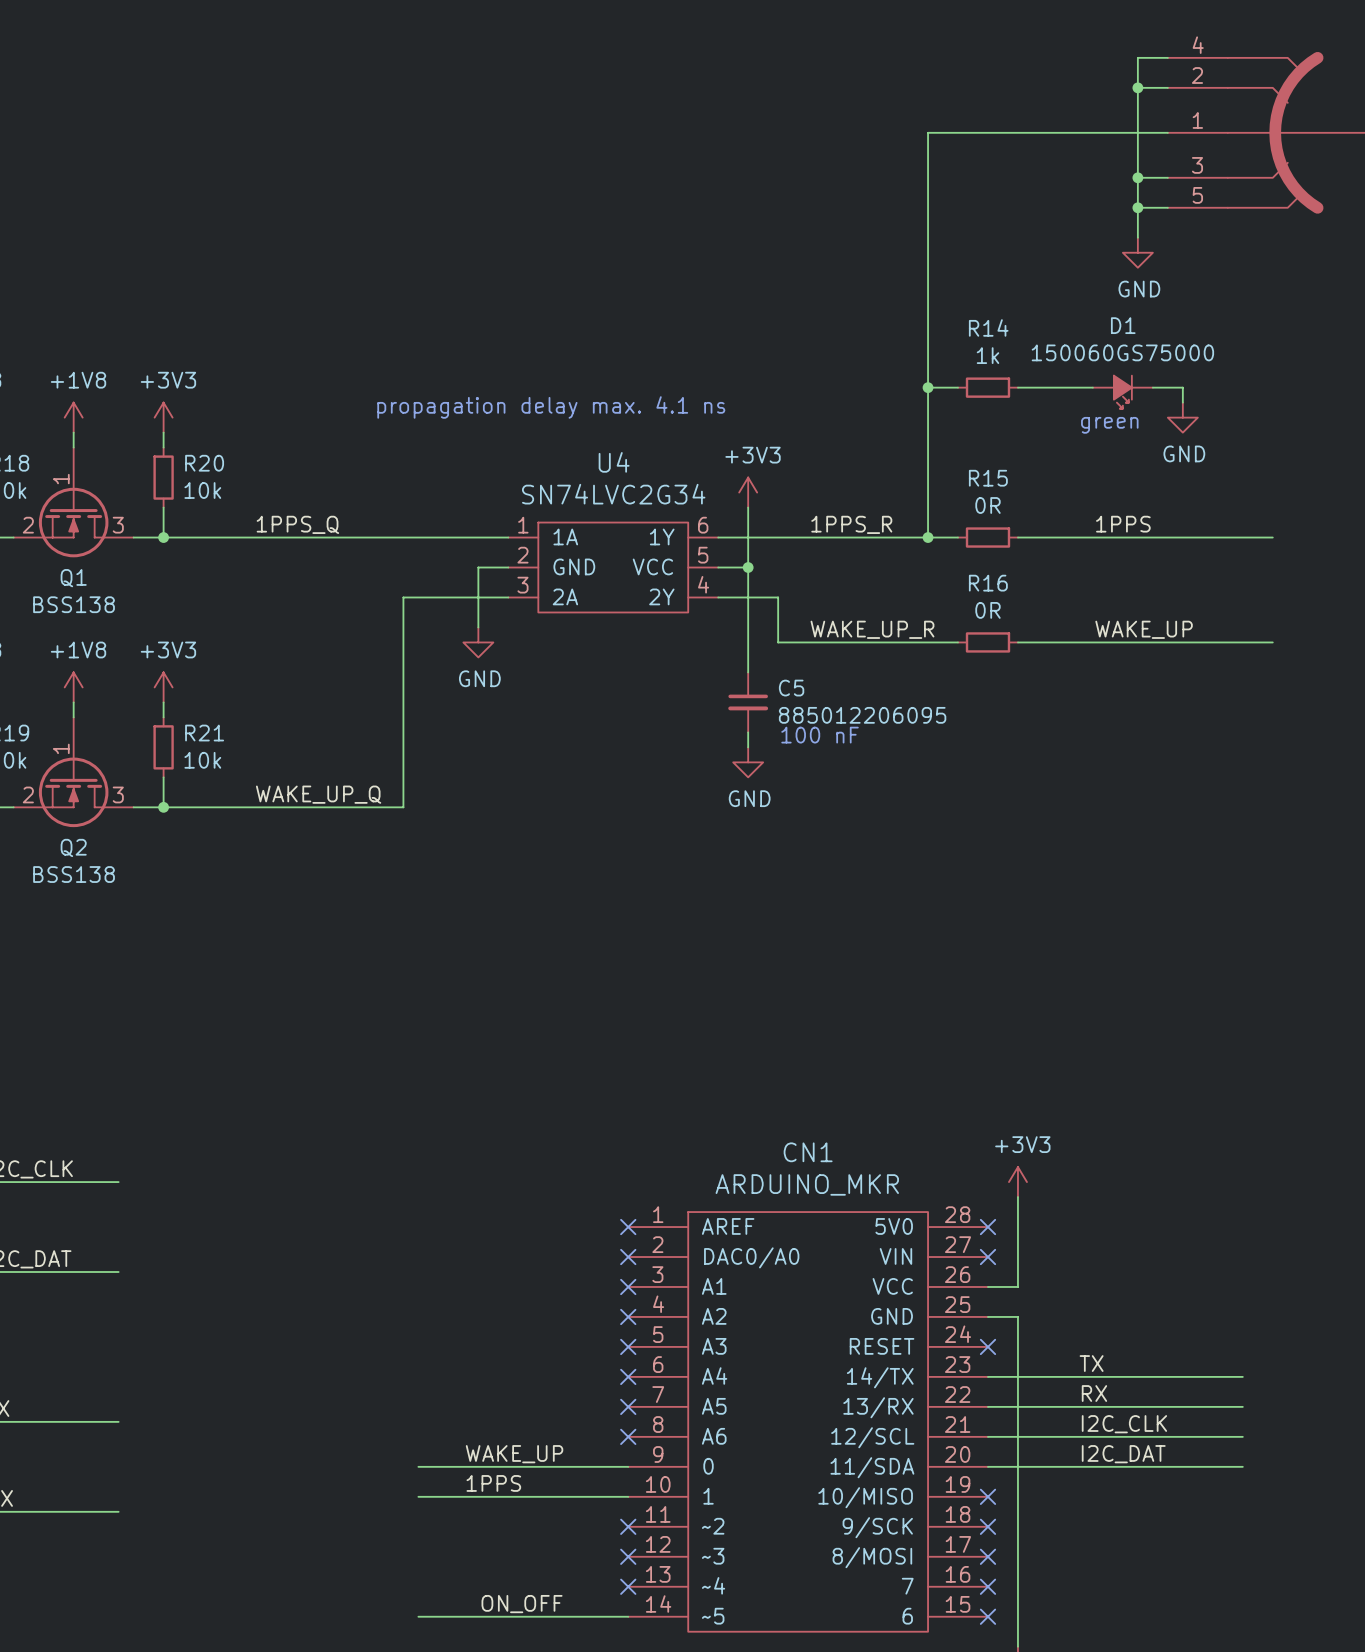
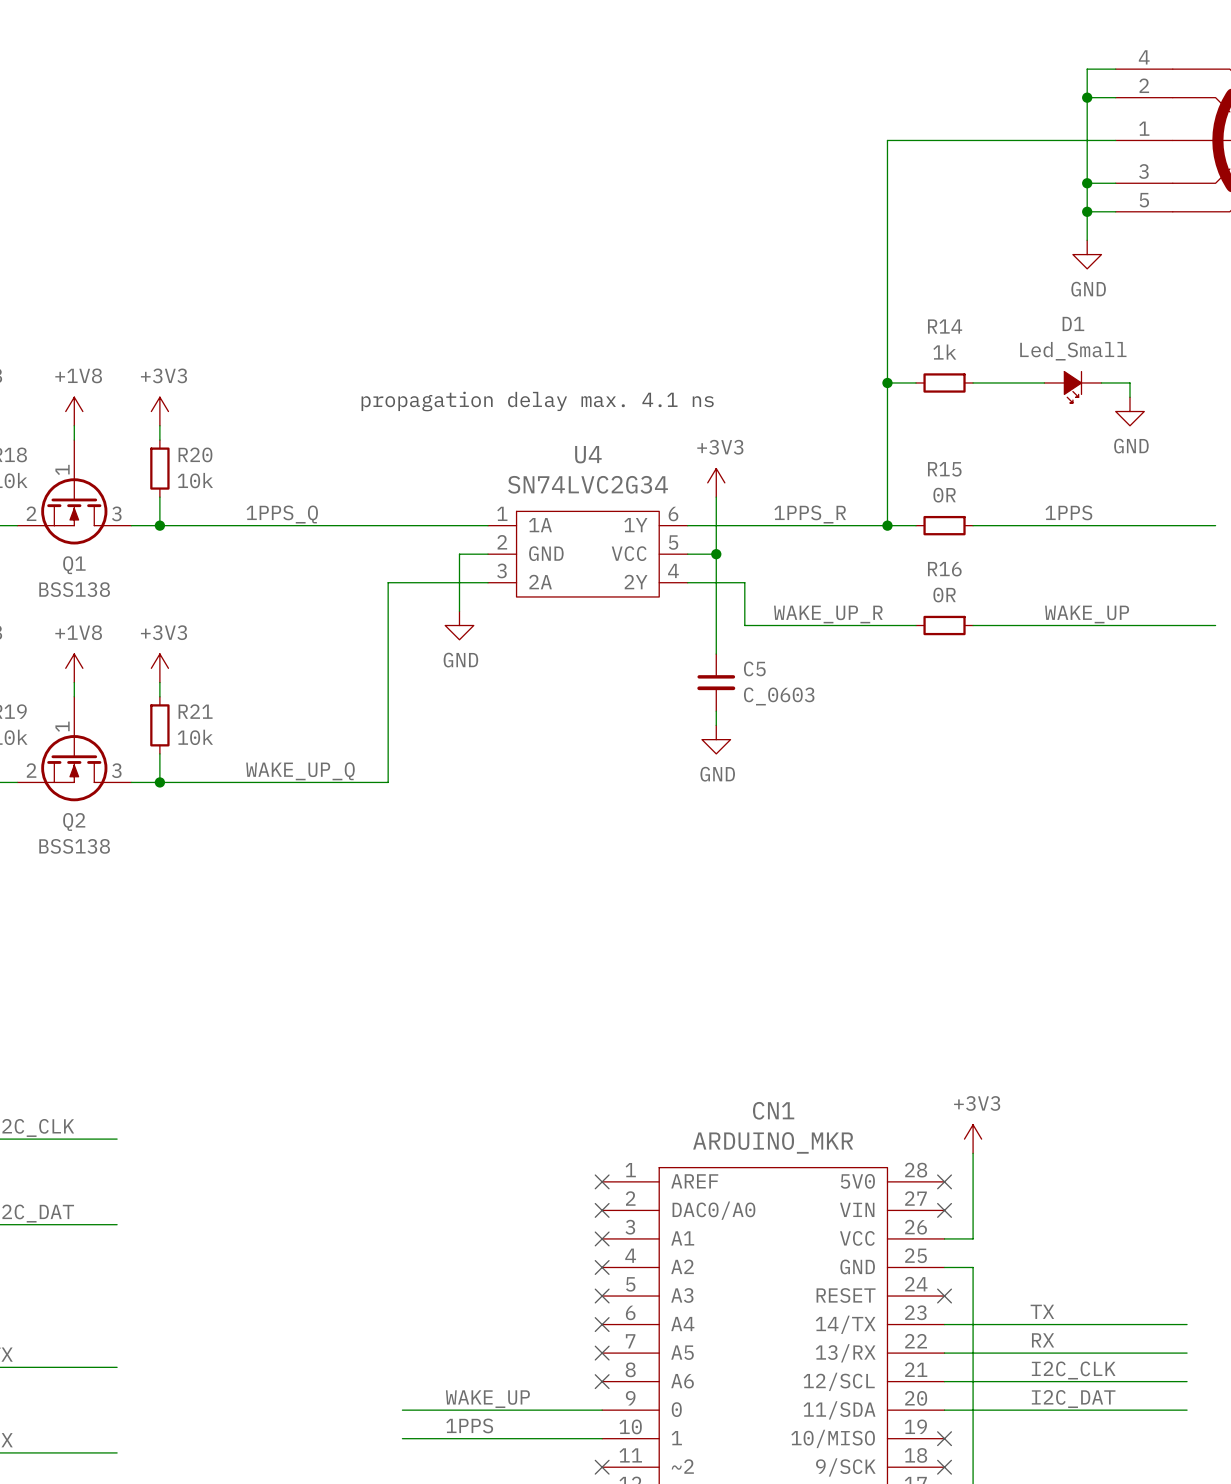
D1 value: 150060GS75000 (1122, 352) -> Led_Small (1073, 351)
text: green (1109, 425) -> none
C5 value: 885012206095 (862, 715) -> C_0603 (779, 696)
text: 100 nF (820, 735) -> none

